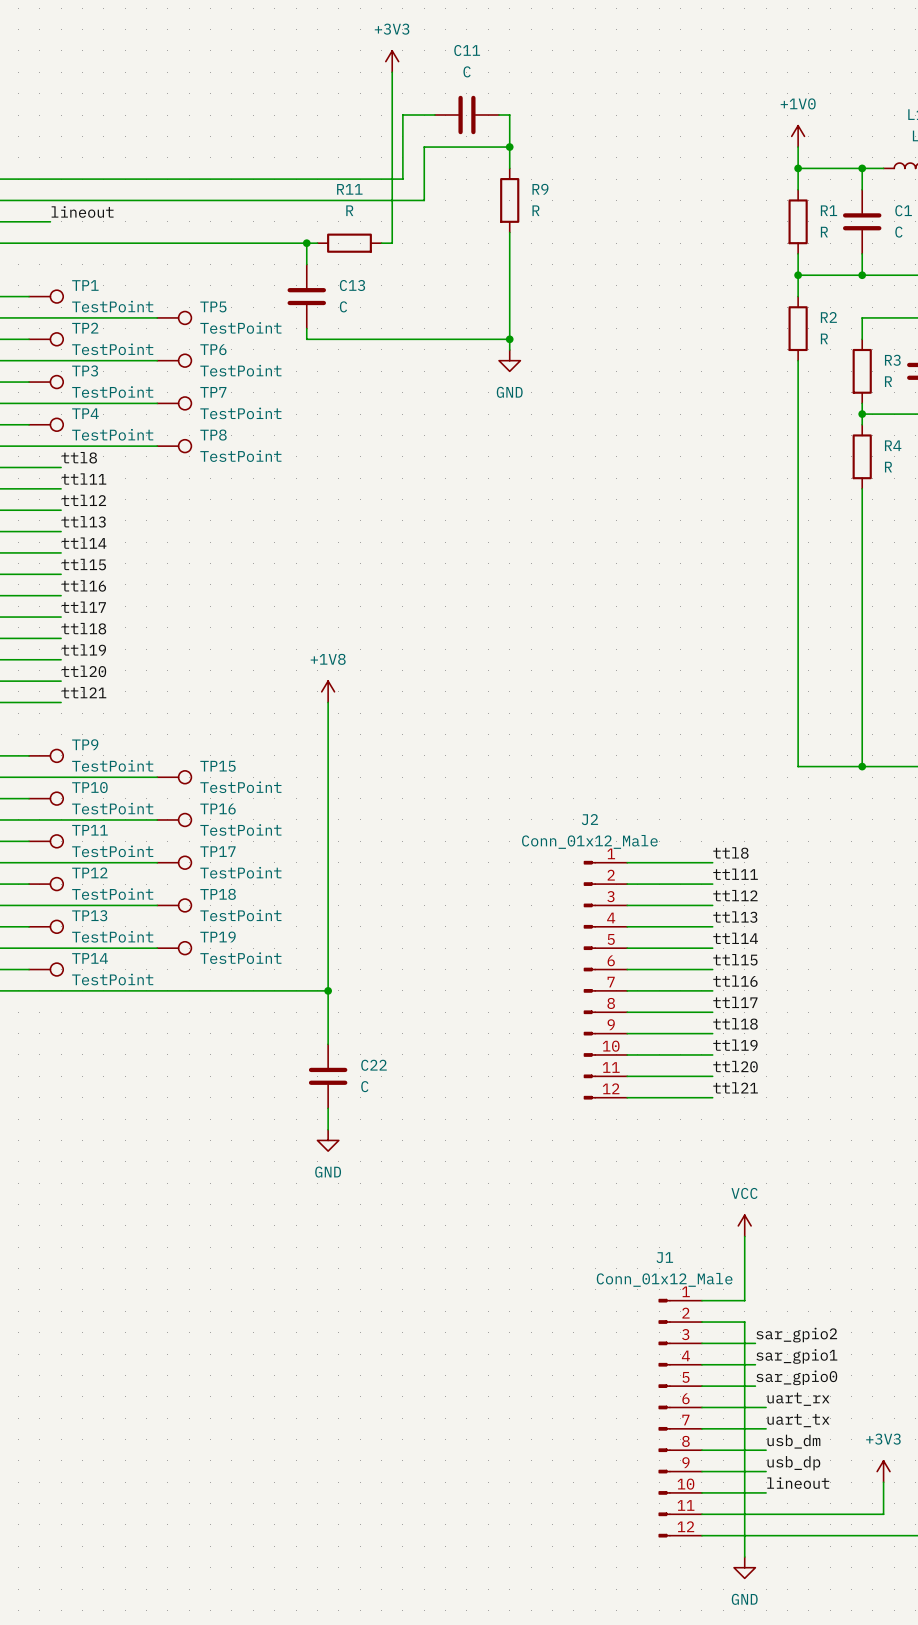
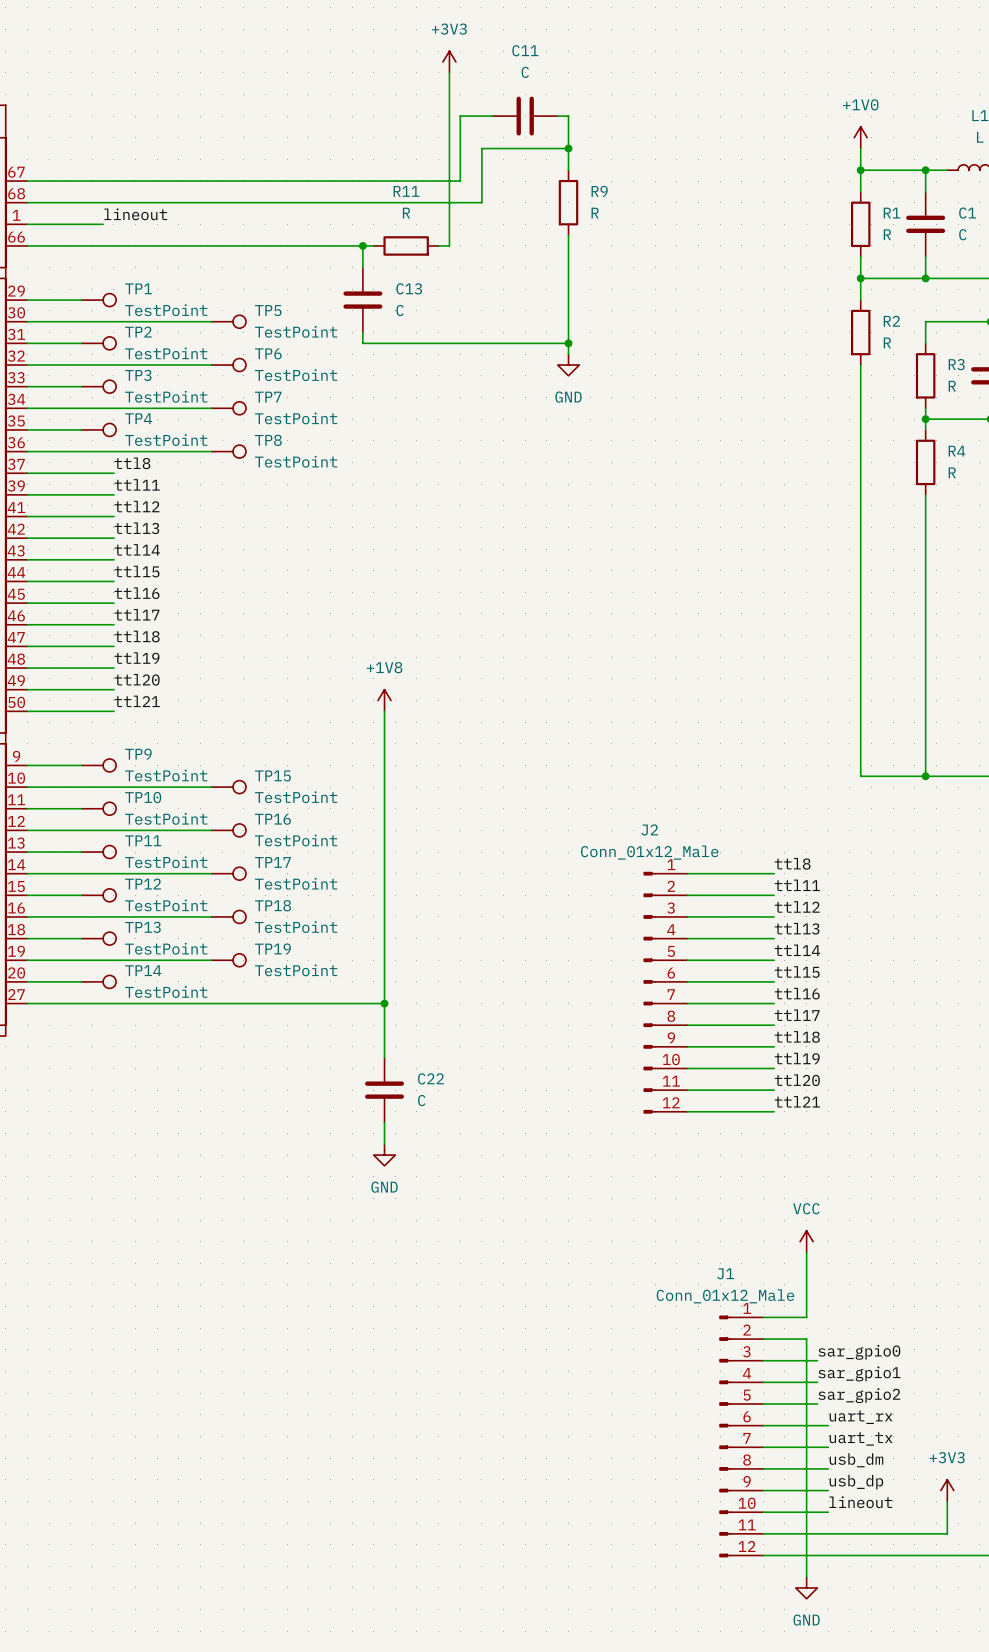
label: sar_gpio2 (796, 1335) -> sar_gpio0 (859, 1352)
label: sar_gpio0 (796, 1377) -> sar_gpio2 (859, 1395)

